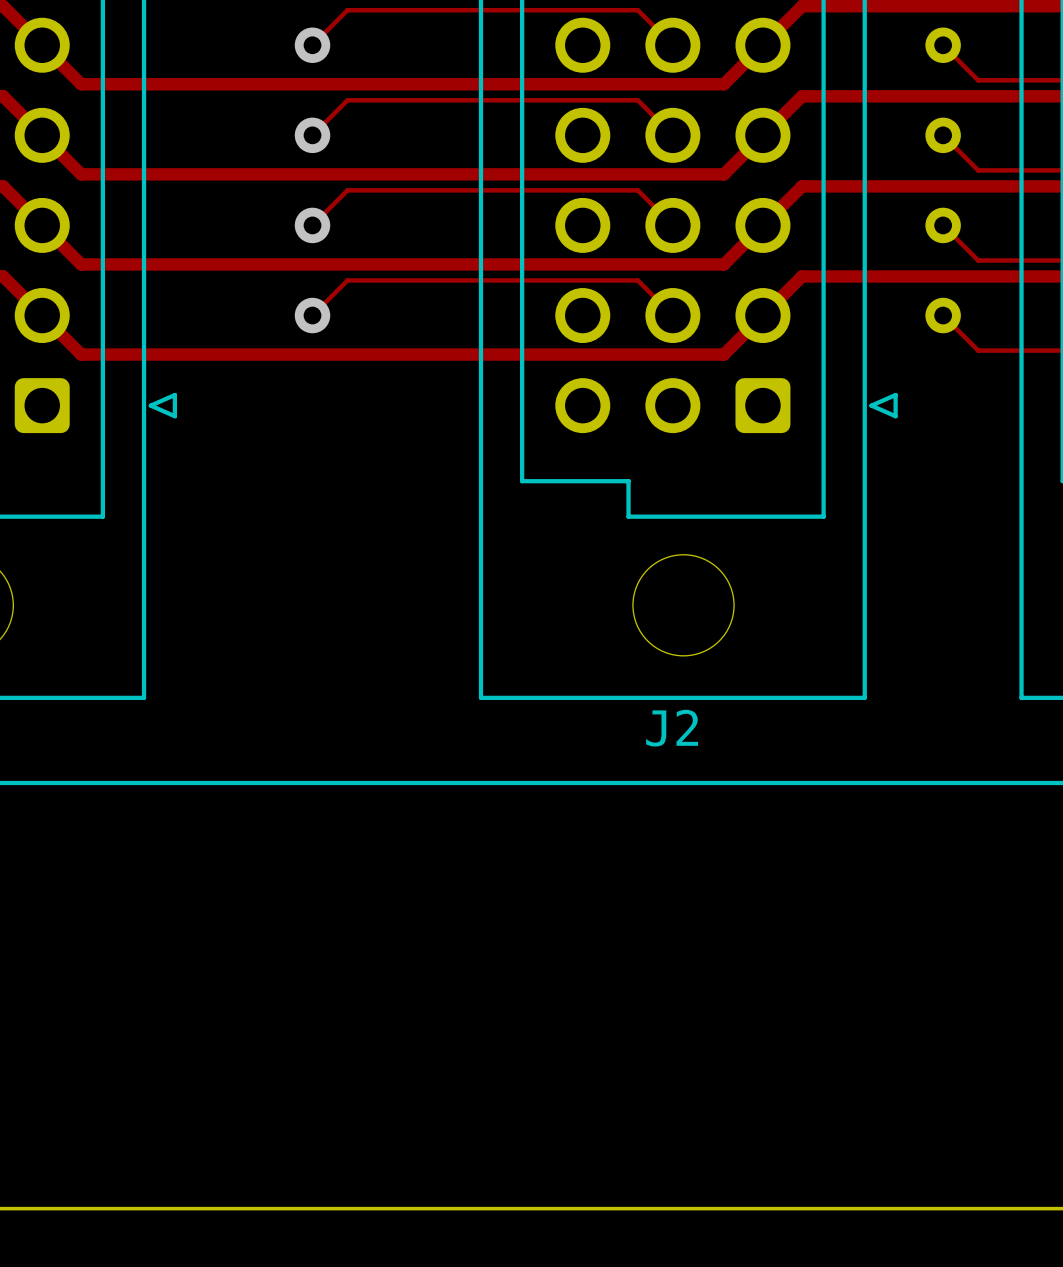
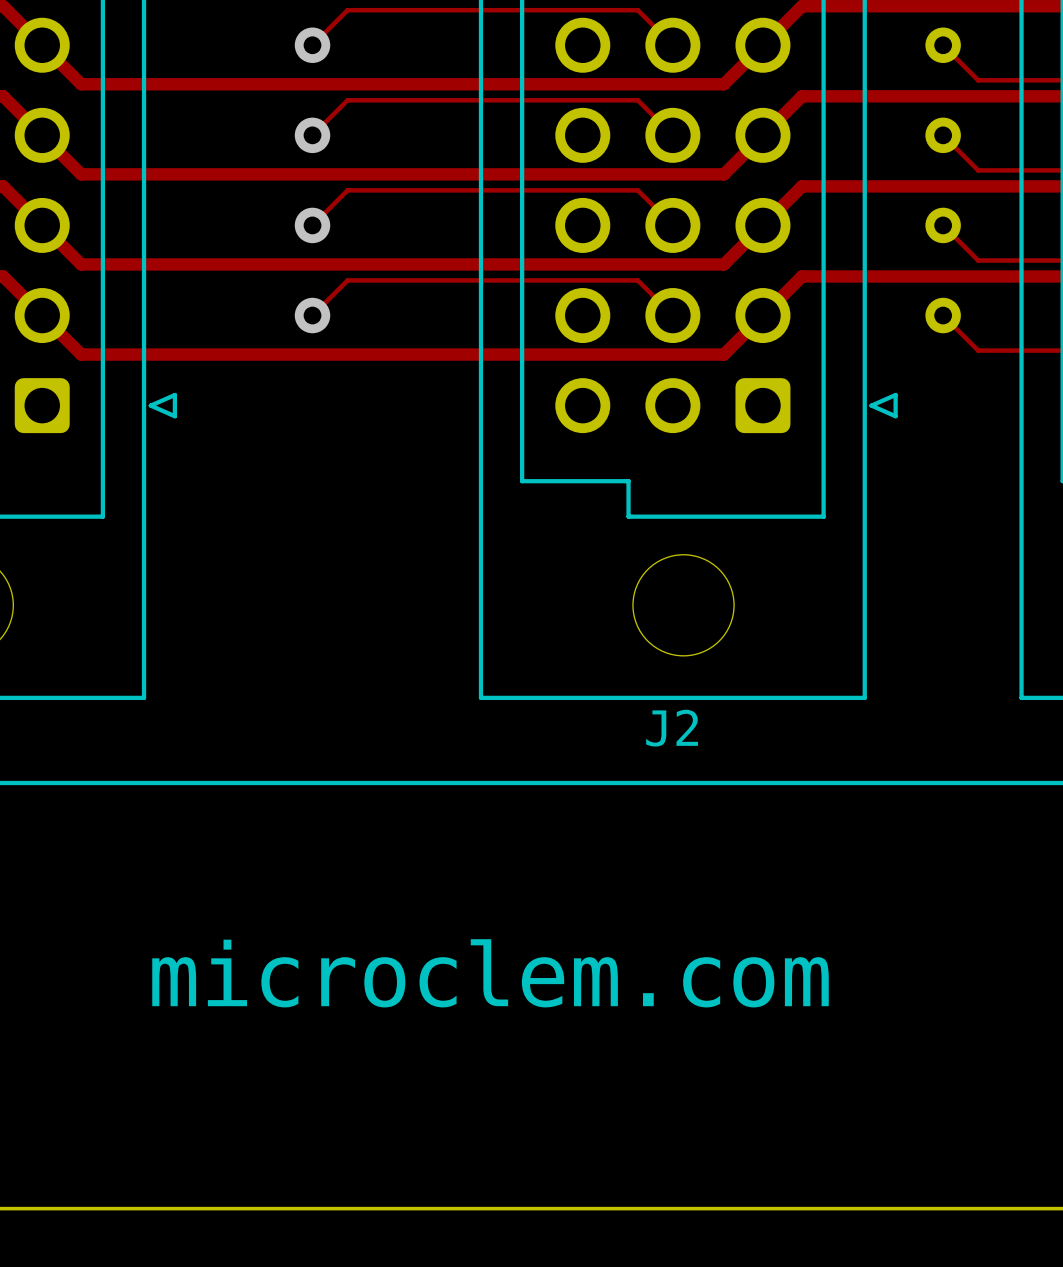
text: none -> microclem.com (490, 973)

